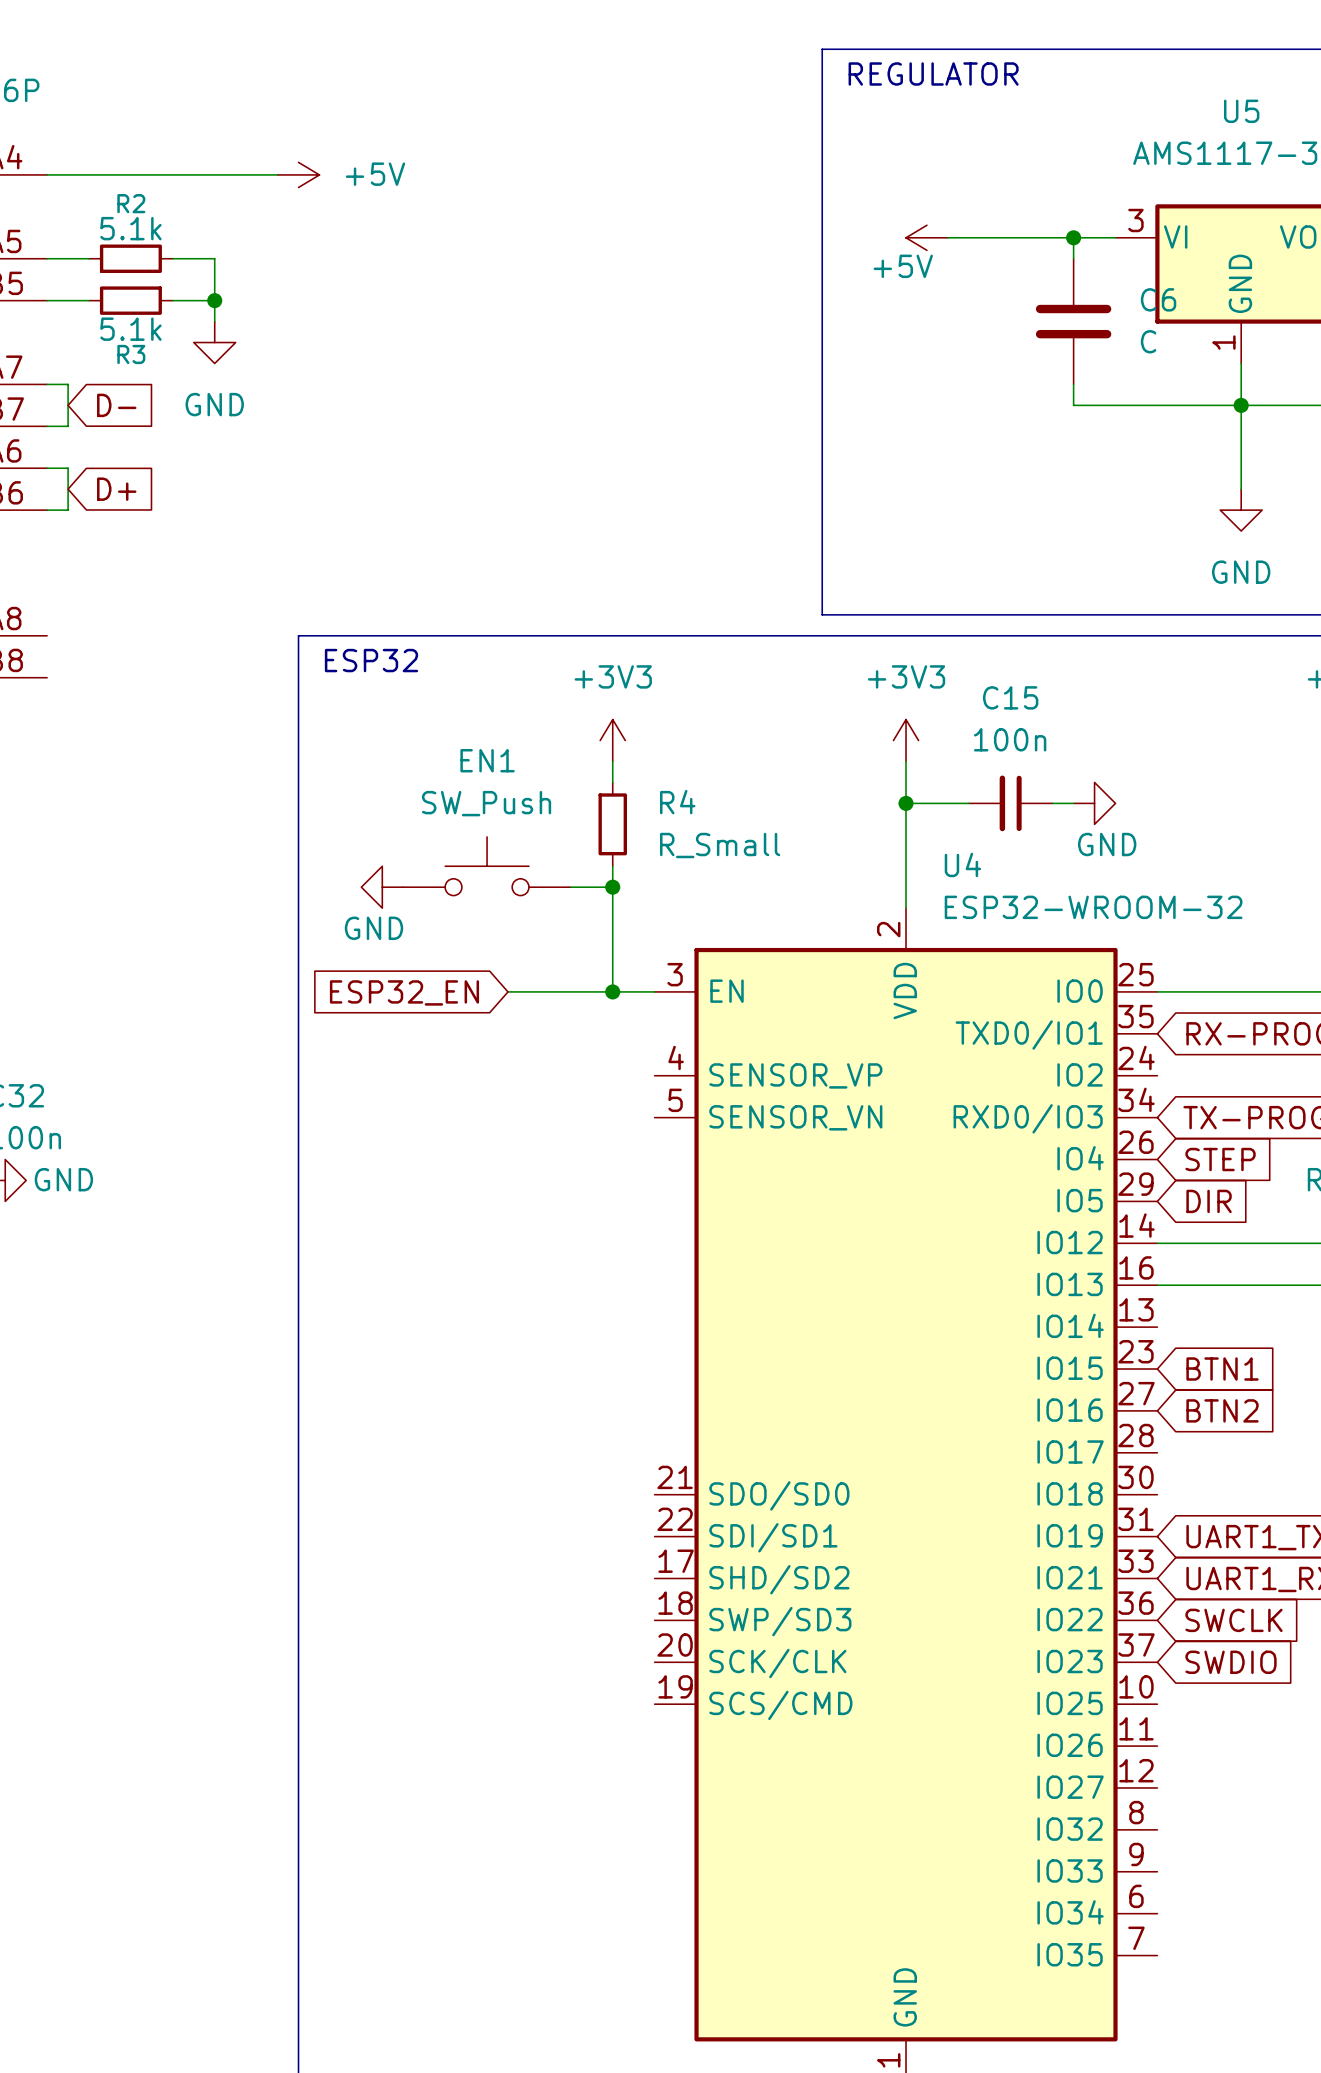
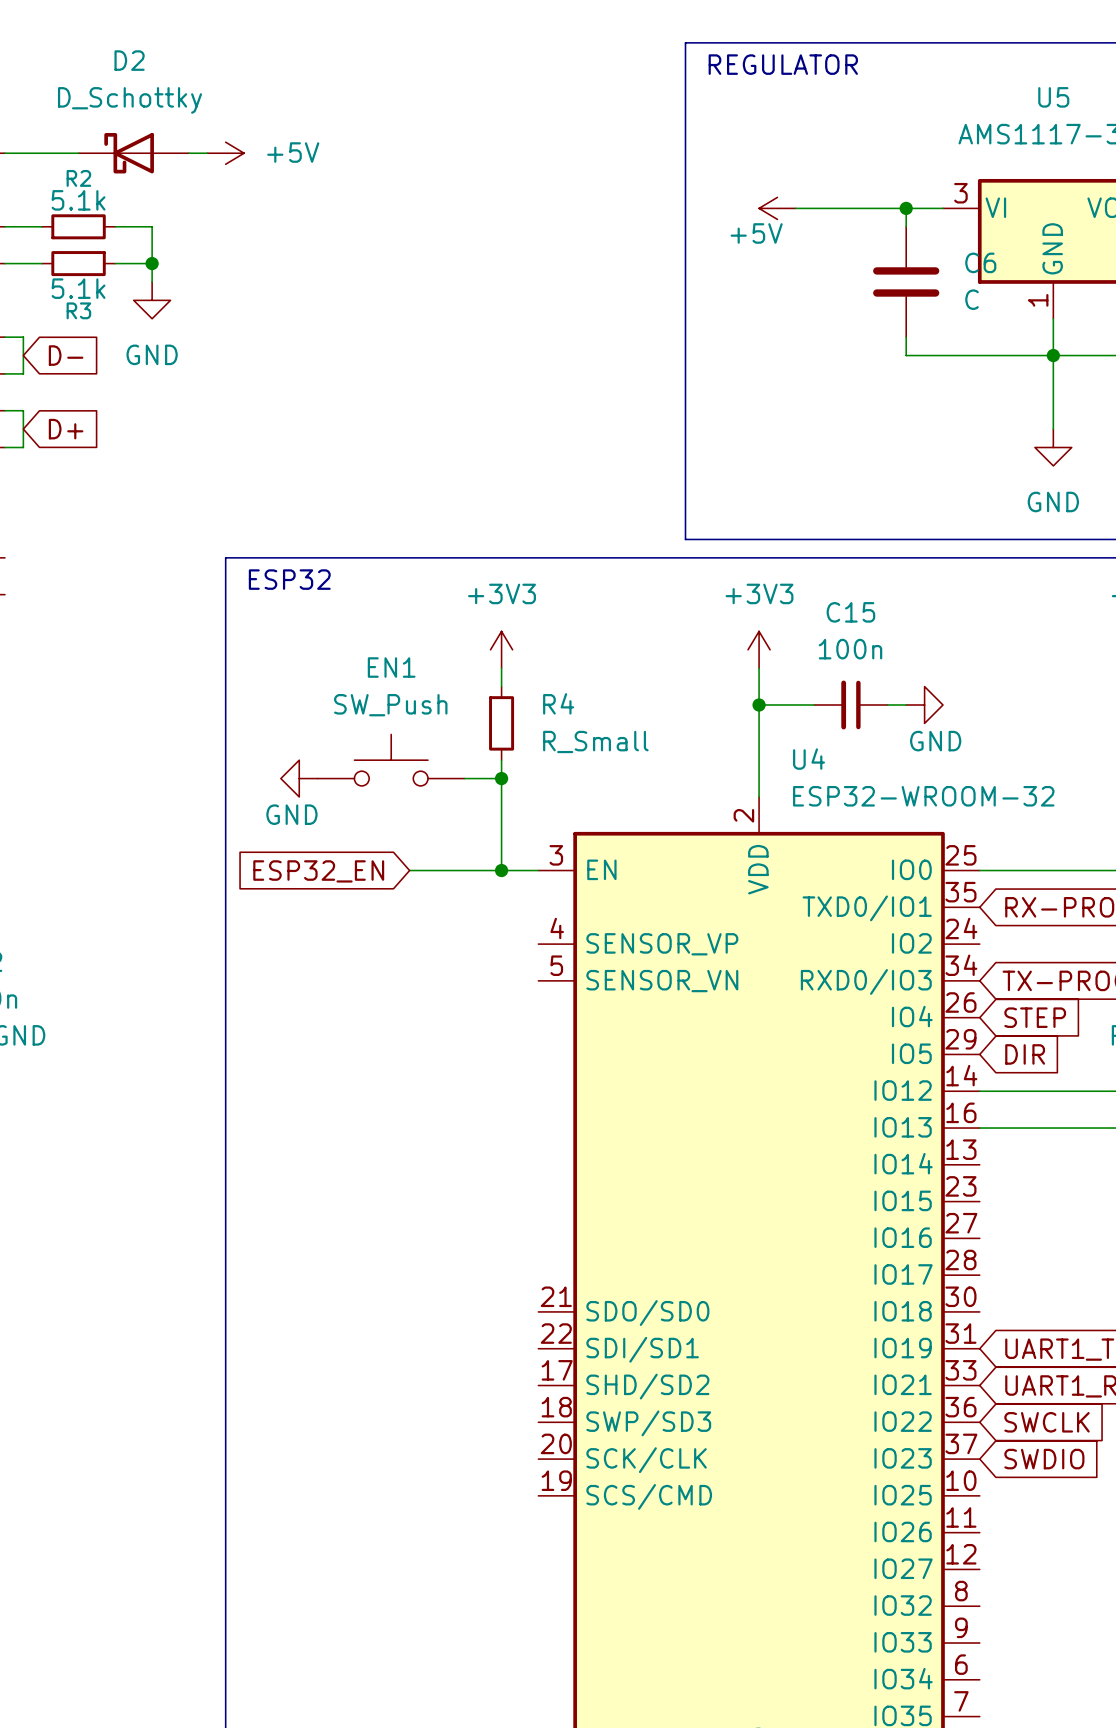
D2: none -> D_Schottky (133, 153)
global label: BTN1 (1222, 1369) -> none
global label: BTN2 (1222, 1410) -> none

